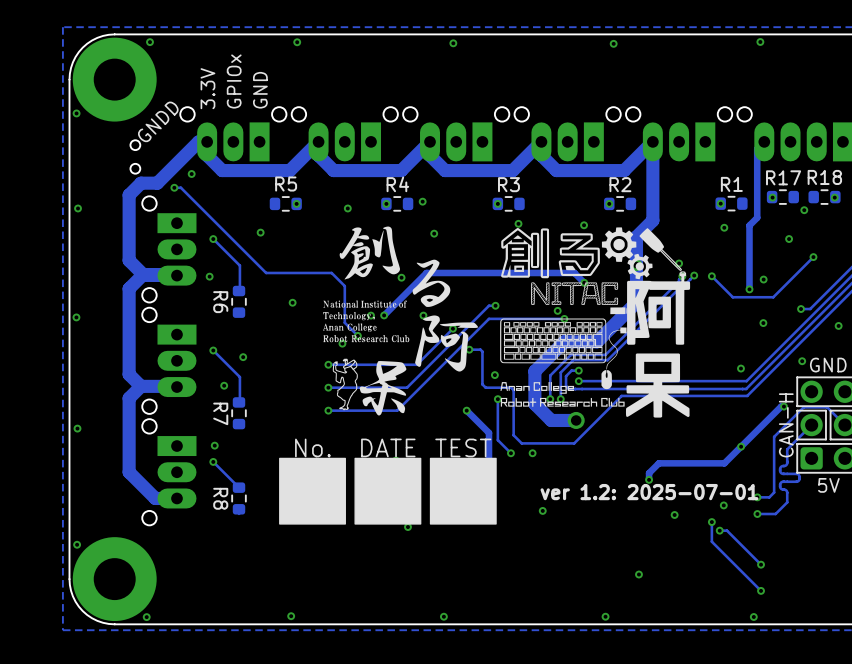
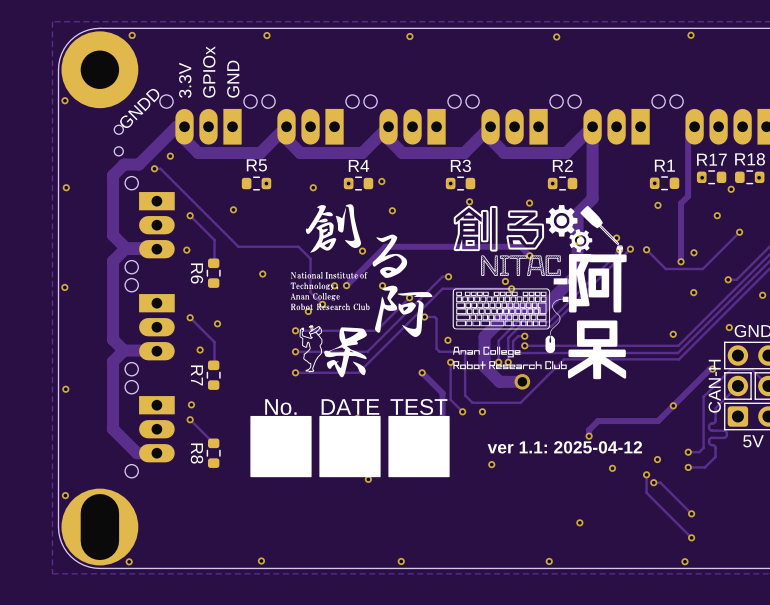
text: ver 1.2: 2025-07-01 (649, 492) -> ver 1.1: 2025-04-12 (564, 447)
part footprint: [72, 537, 157, 622] -> [61, 488, 139, 566]

